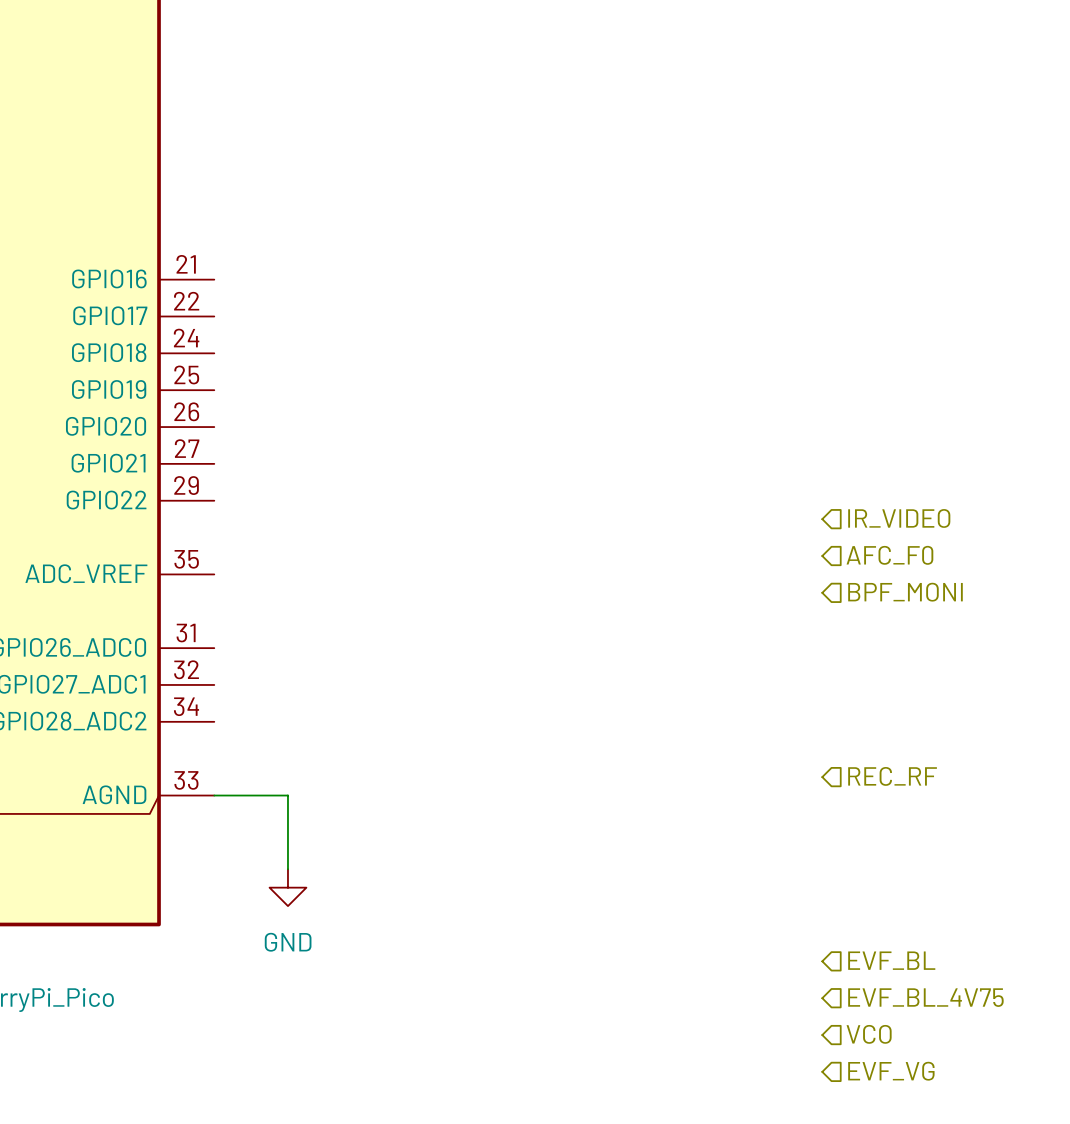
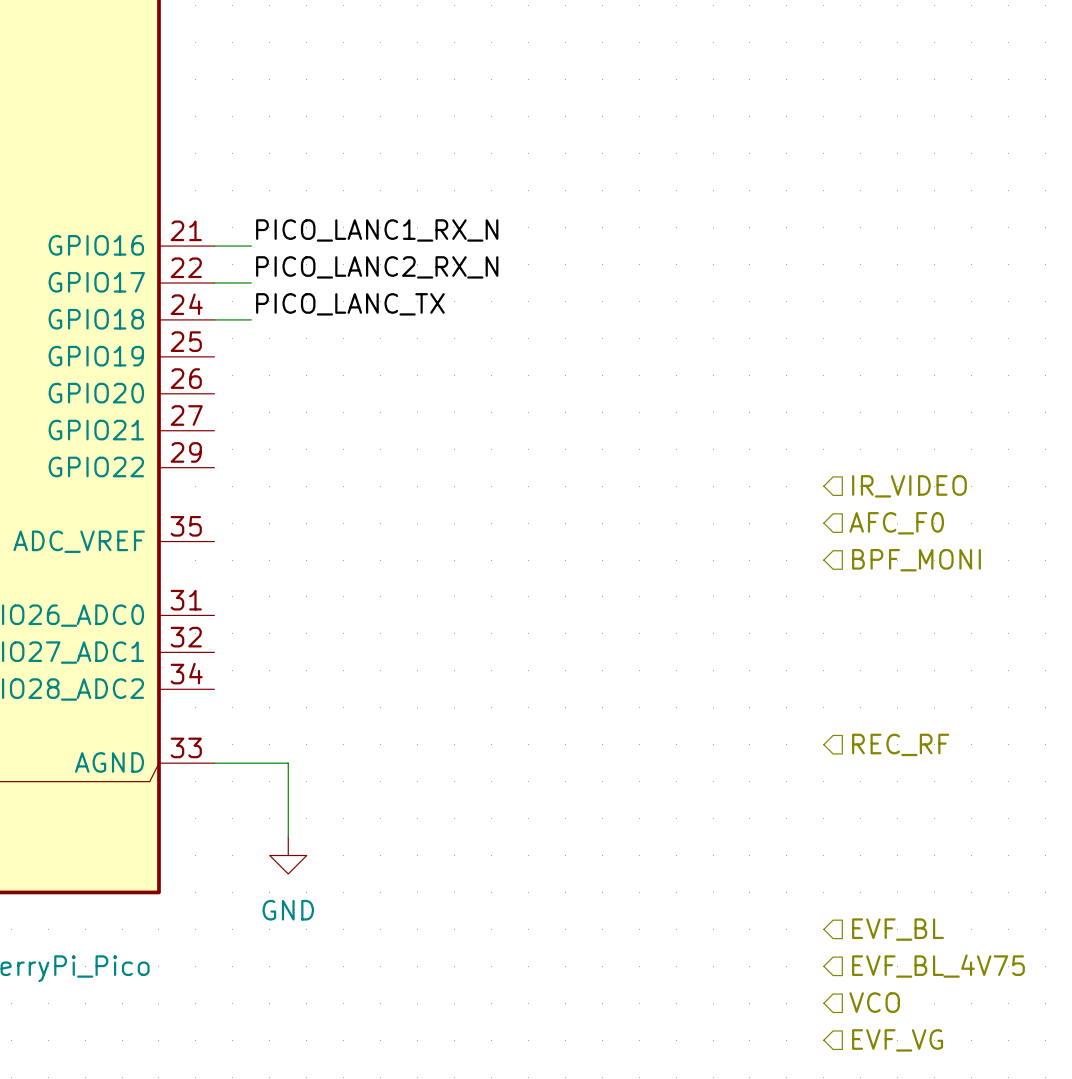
label: none -> PICO_LANC1_RX_N (377, 230)
wire: none -> (214, 246) (251, 246)
label: none -> PICO_LANC2_RX_N (377, 267)
wire: none -> (214, 282) (251, 282)
label: none -> PICO_LANC_TX (350, 304)
wire: none -> (214, 319) (251, 319)

